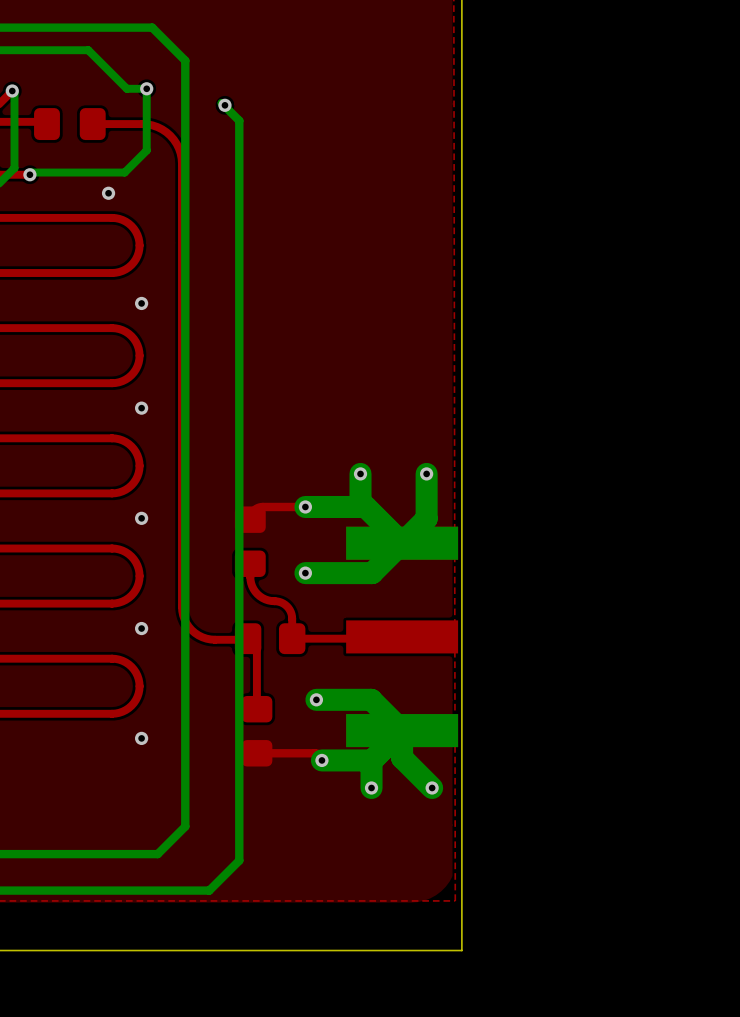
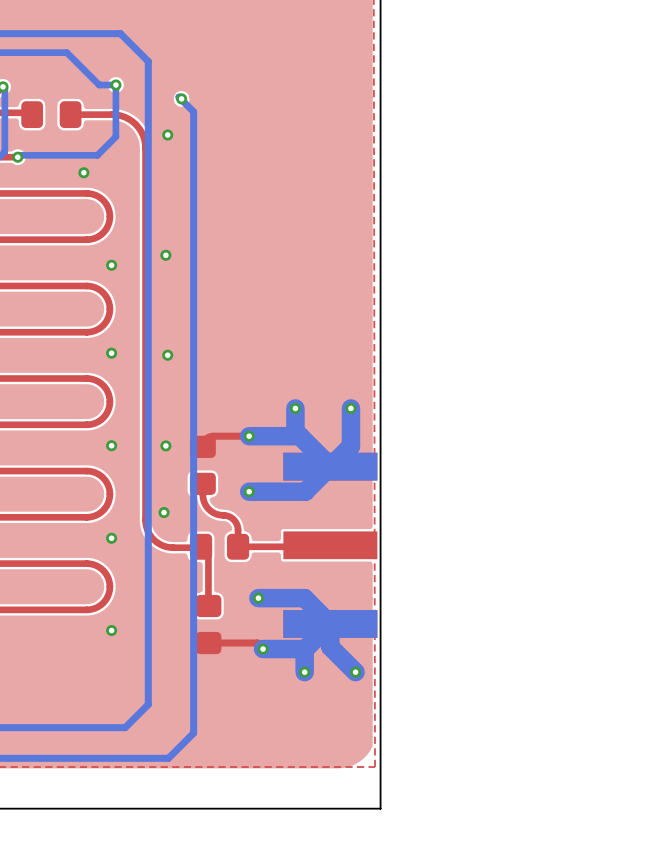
via: none -> (167, 134)
via: none -> (165, 255)
via: none -> (167, 355)
via: none -> (165, 445)
via: none -> (164, 512)

